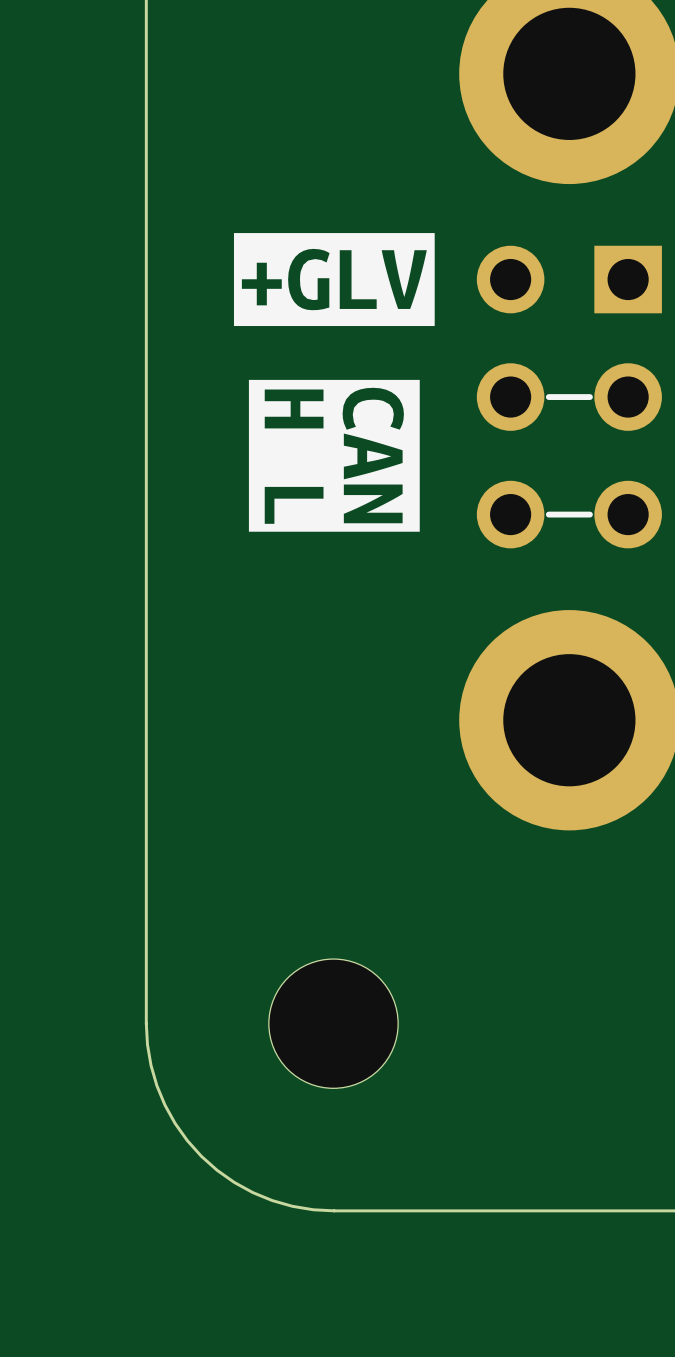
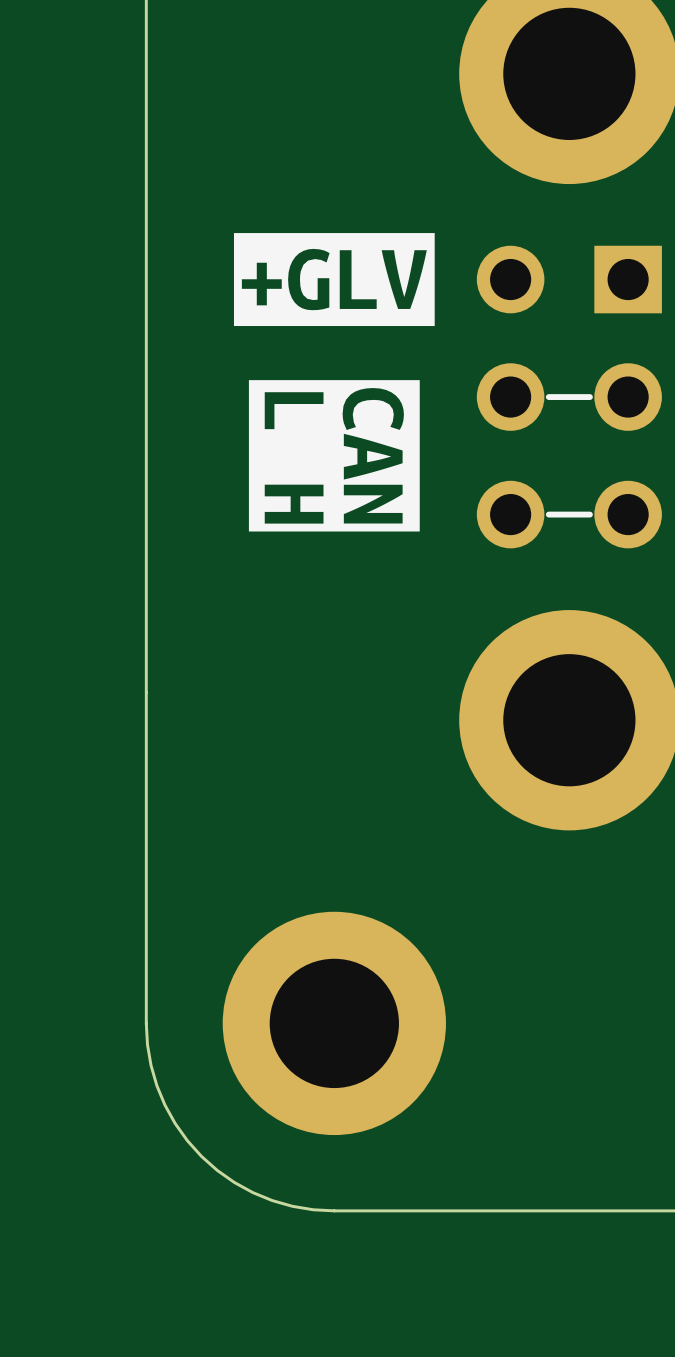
drawing shape: [248, 379, 420, 532] -> [248, 380, 420, 532]
part footprint: [268, 959, 399, 1089] -> [222, 911, 446, 1136]

